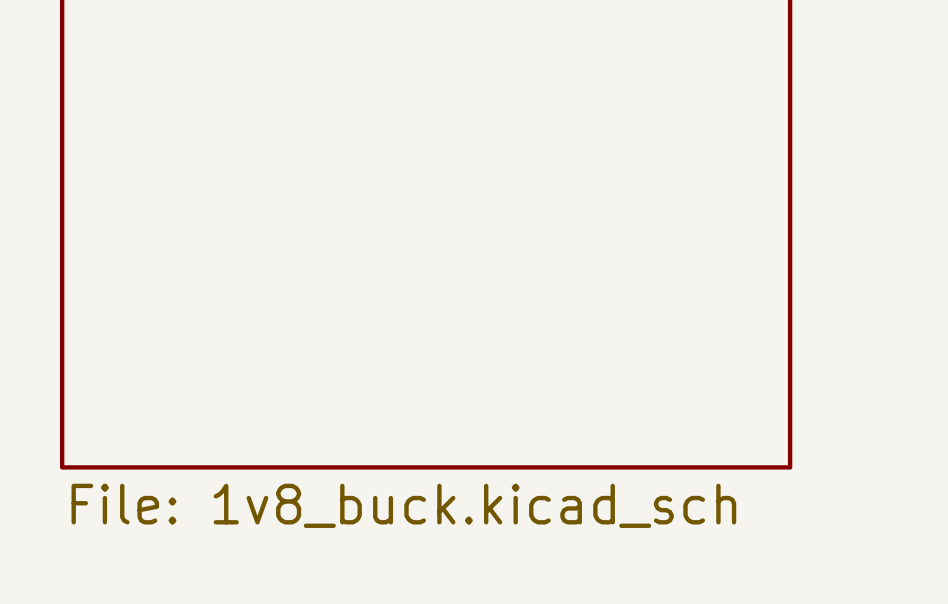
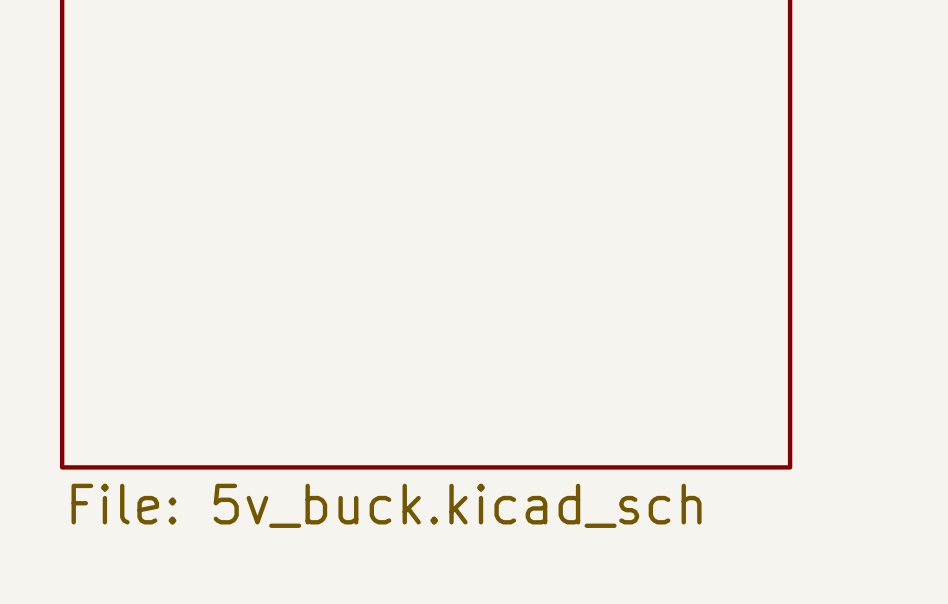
sheet value: File: 1v8_buck.kicad_sch (403, 505) -> File: 5v_buck.kicad_sch (386, 505)

